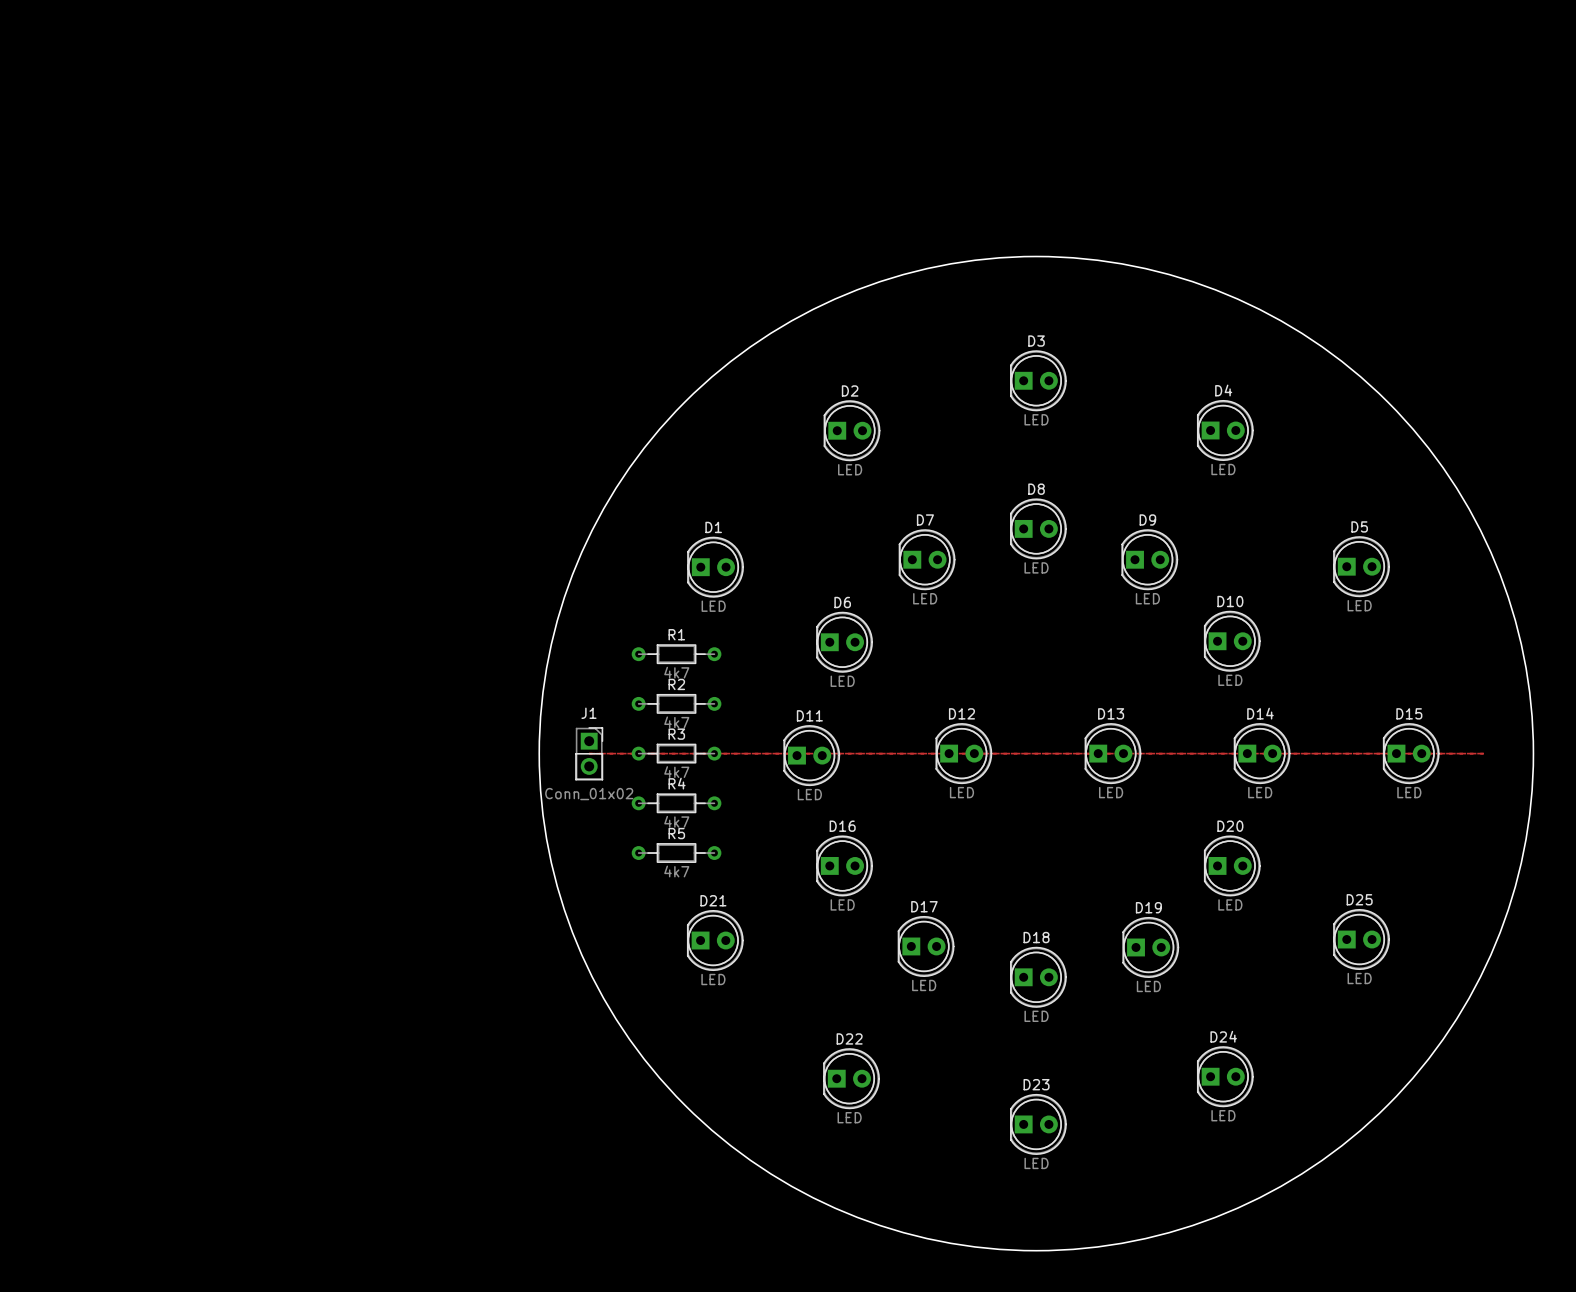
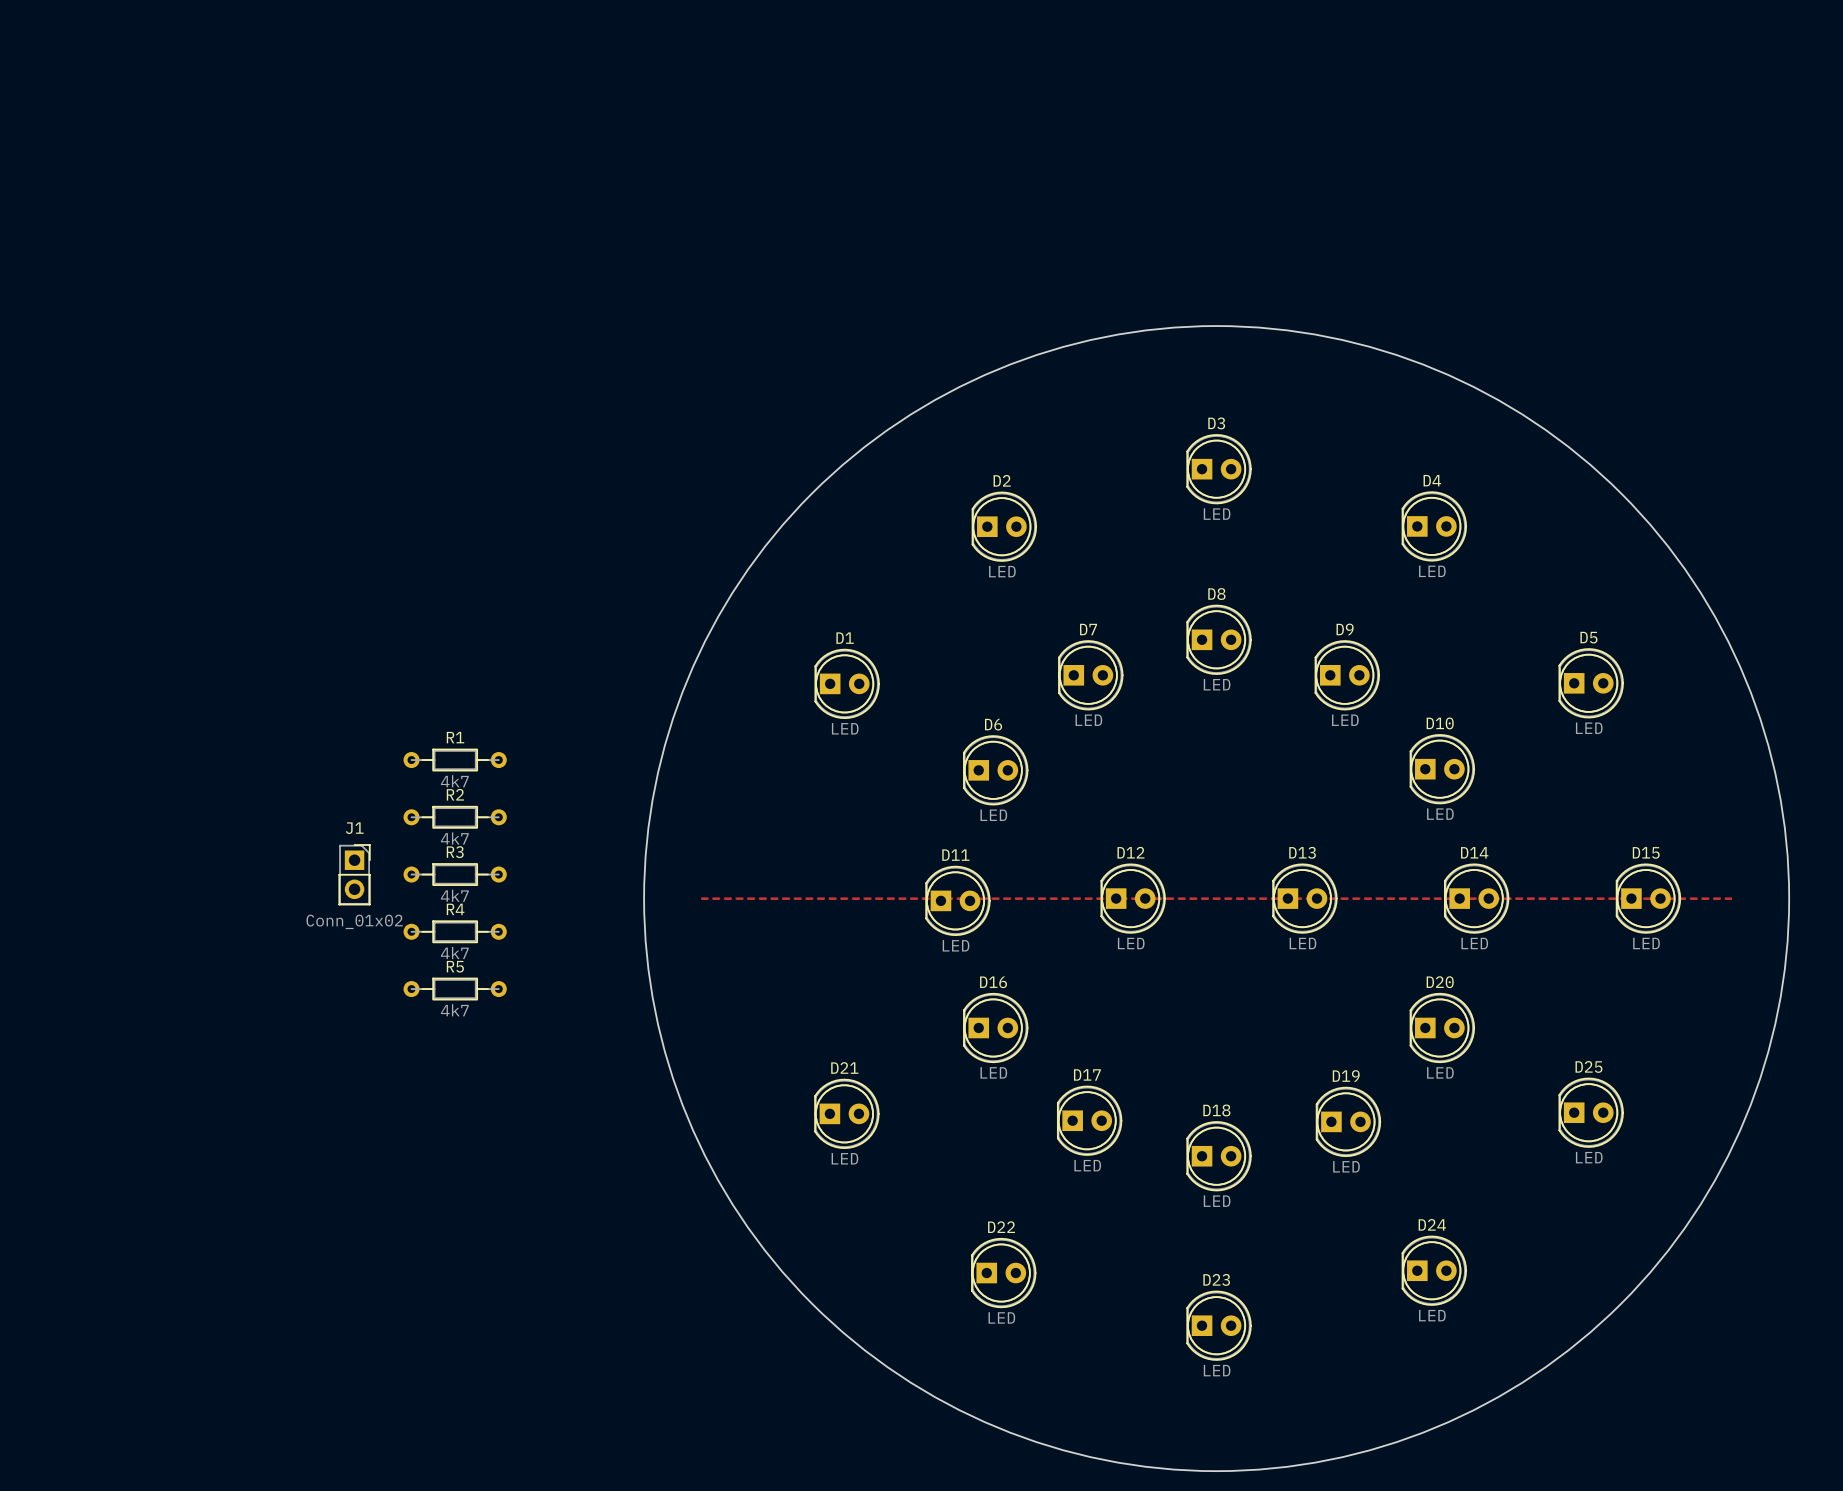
R1 position: (676, 654) -> (455, 760)
R2 position: (676, 703) -> (455, 817)
J1 position: (589, 753) -> (354, 874)
R3 position: (676, 753) -> (455, 874)
R4 position: (676, 803) -> (455, 931)
R5 position: (676, 853) -> (455, 989)

